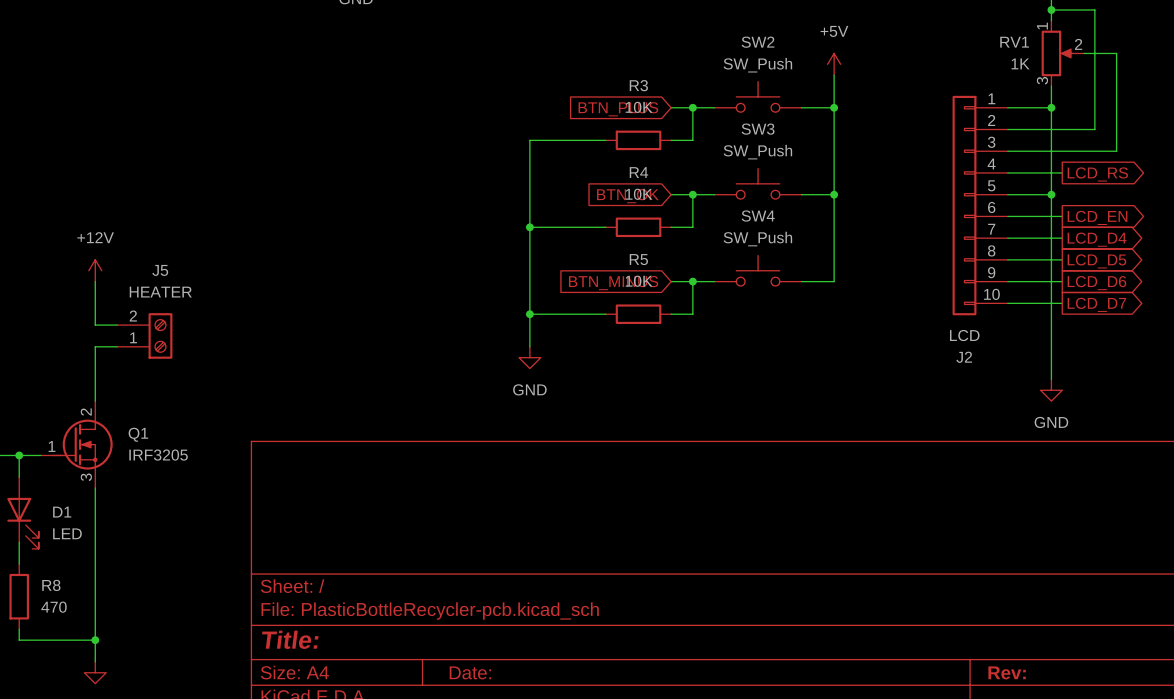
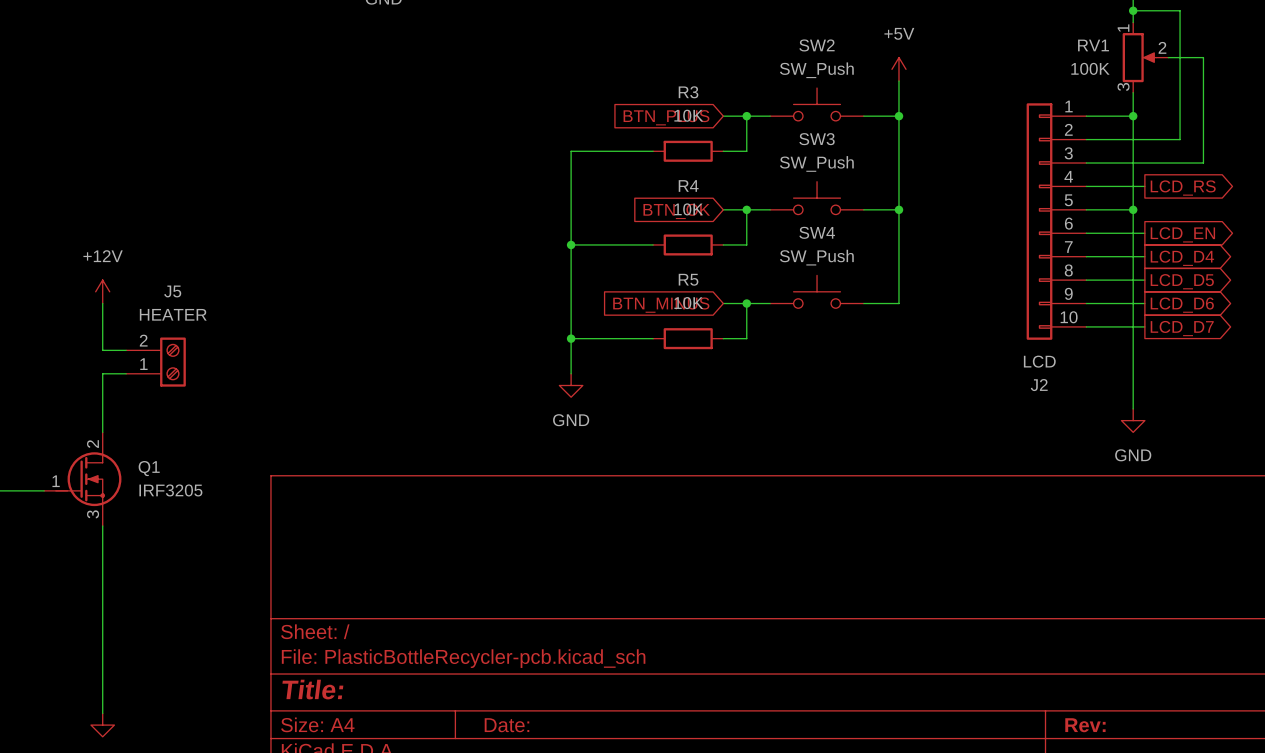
RV1 value: 1K (1020, 63) -> 100K (1090, 68)
wire: (19, 455) (19, 477) -> none
junction: (19, 455) -> none
D1: LED (23, 513) -> none
wire: (19, 542) (19, 564) -> none
R8: 470 (19, 596) -> none
wire: (19, 629) (19, 640) (95, 640) -> none
junction: (95, 640) -> none

